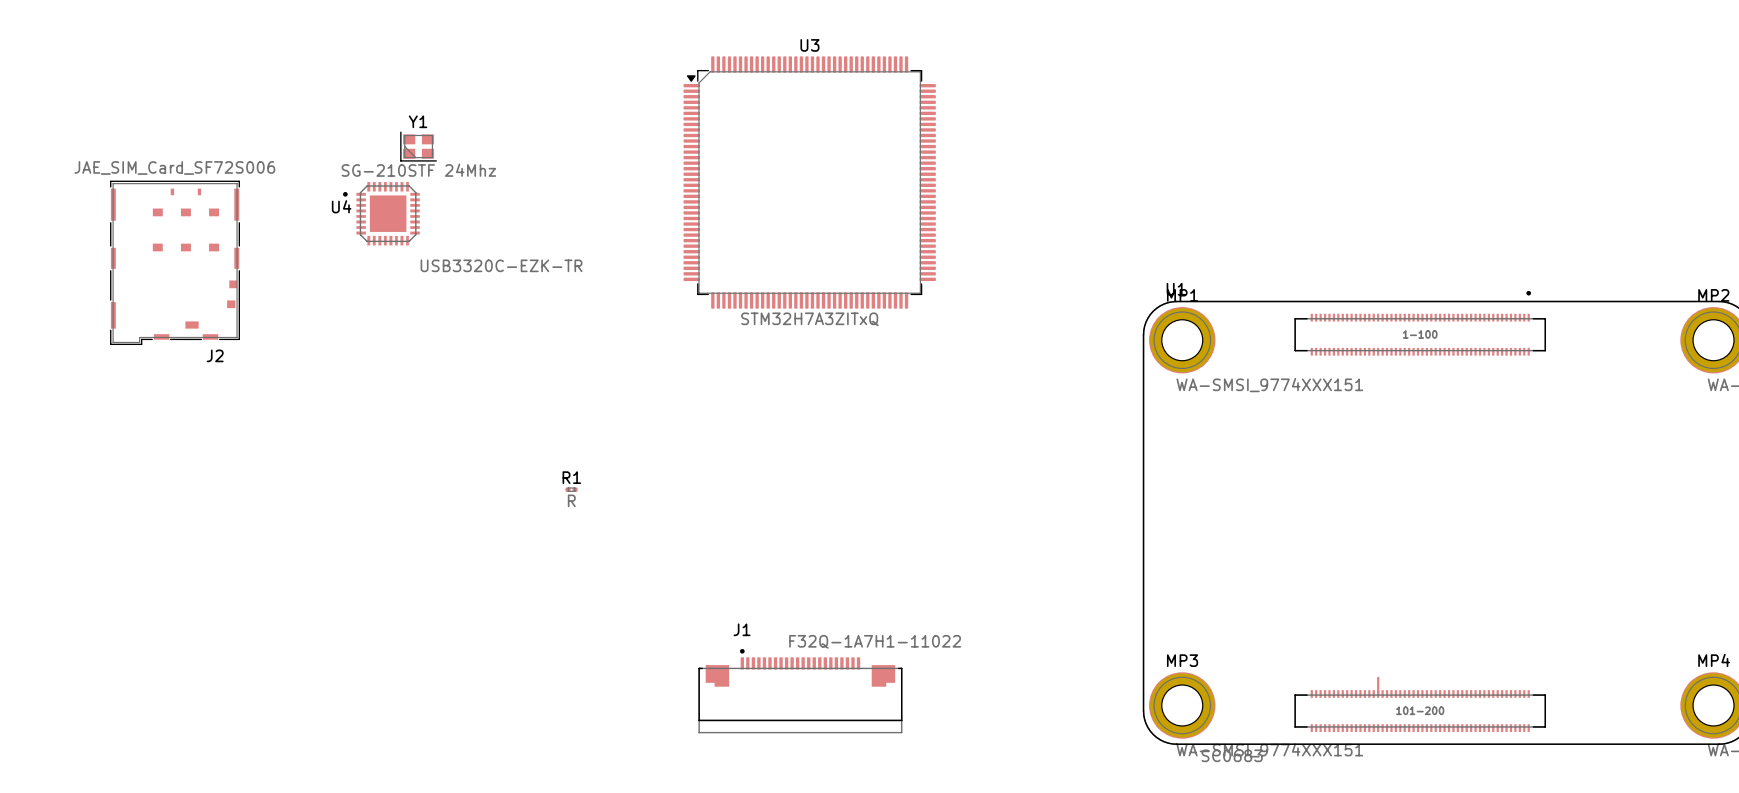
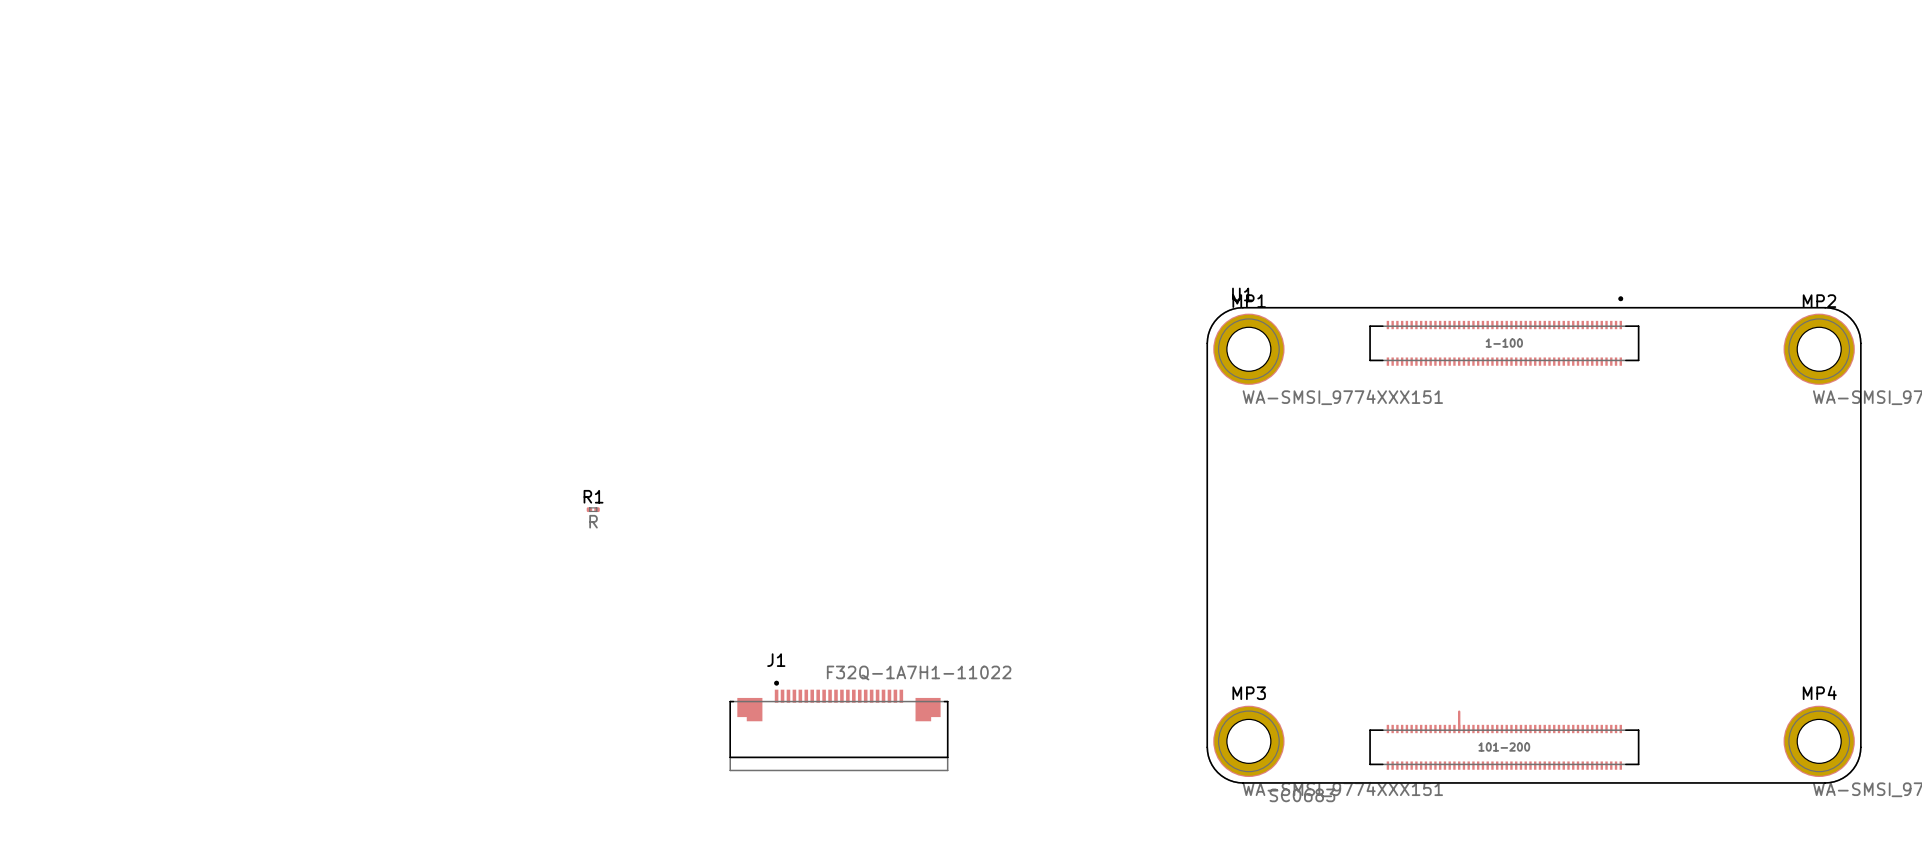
Y1: SG-210STF 24Mhz (418, 146) -> none
U3: STM32H7A3ZITxQ (809, 182) -> none
U4: USB3320C-EZK-TR (381, 213) -> none
J2: JAE_SIM_Card_SF72S006 (175, 262) -> none

